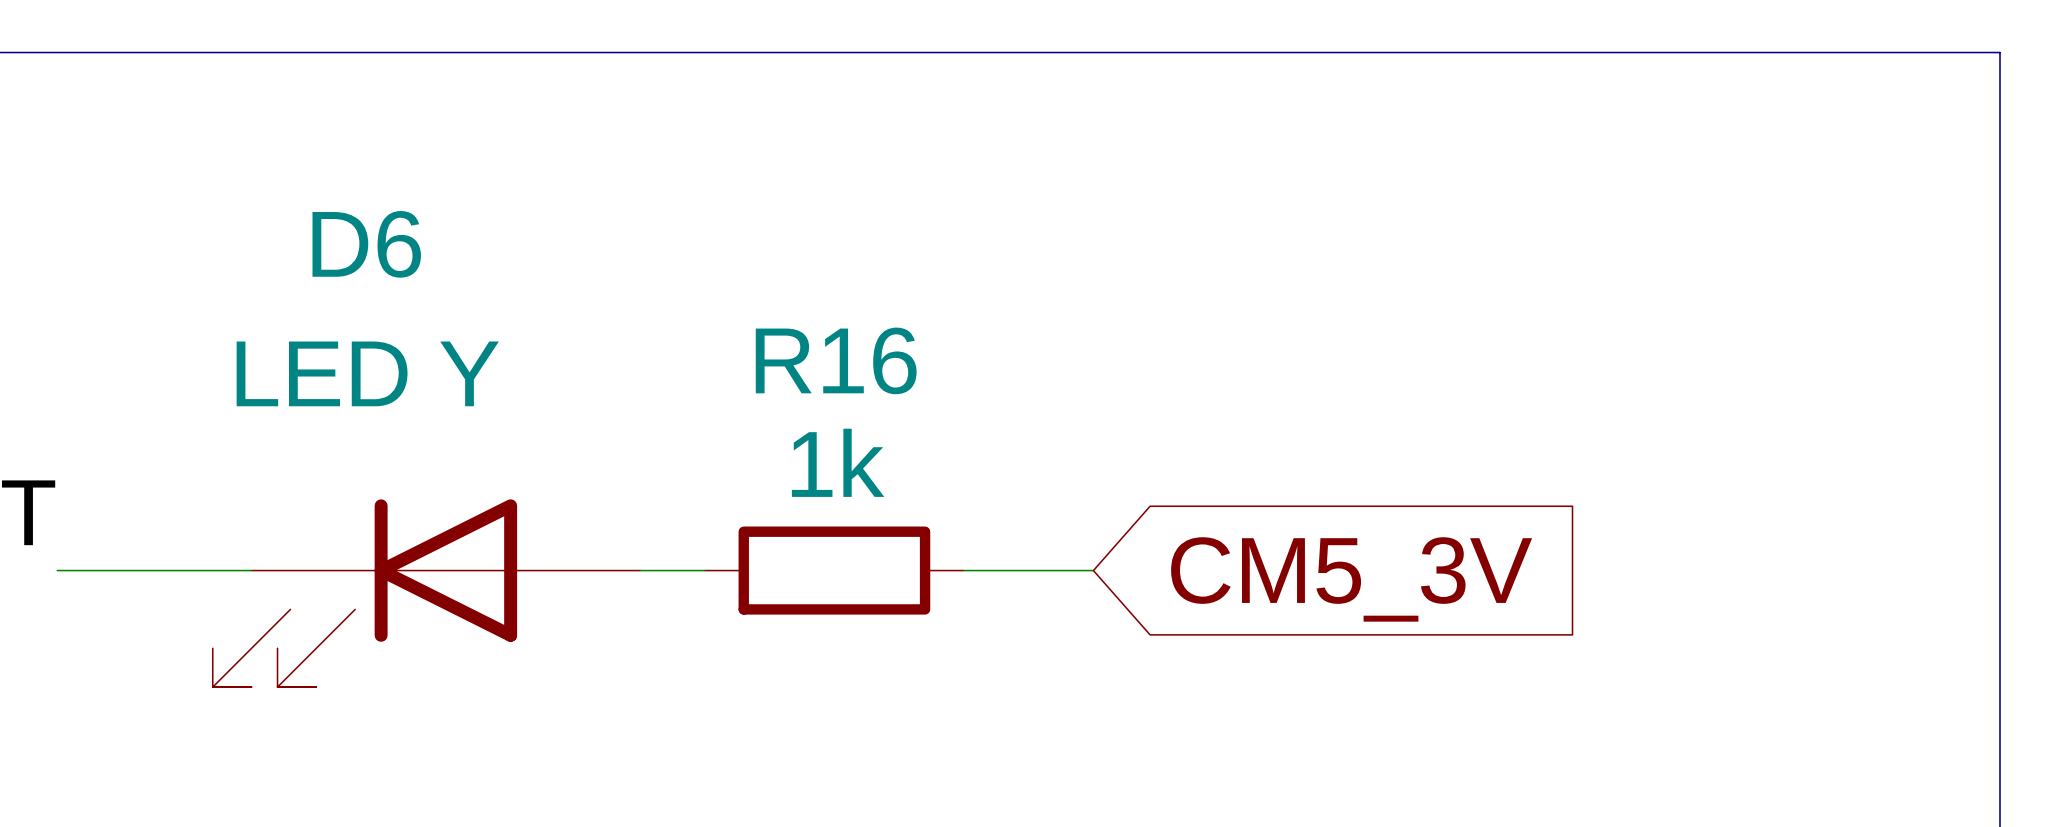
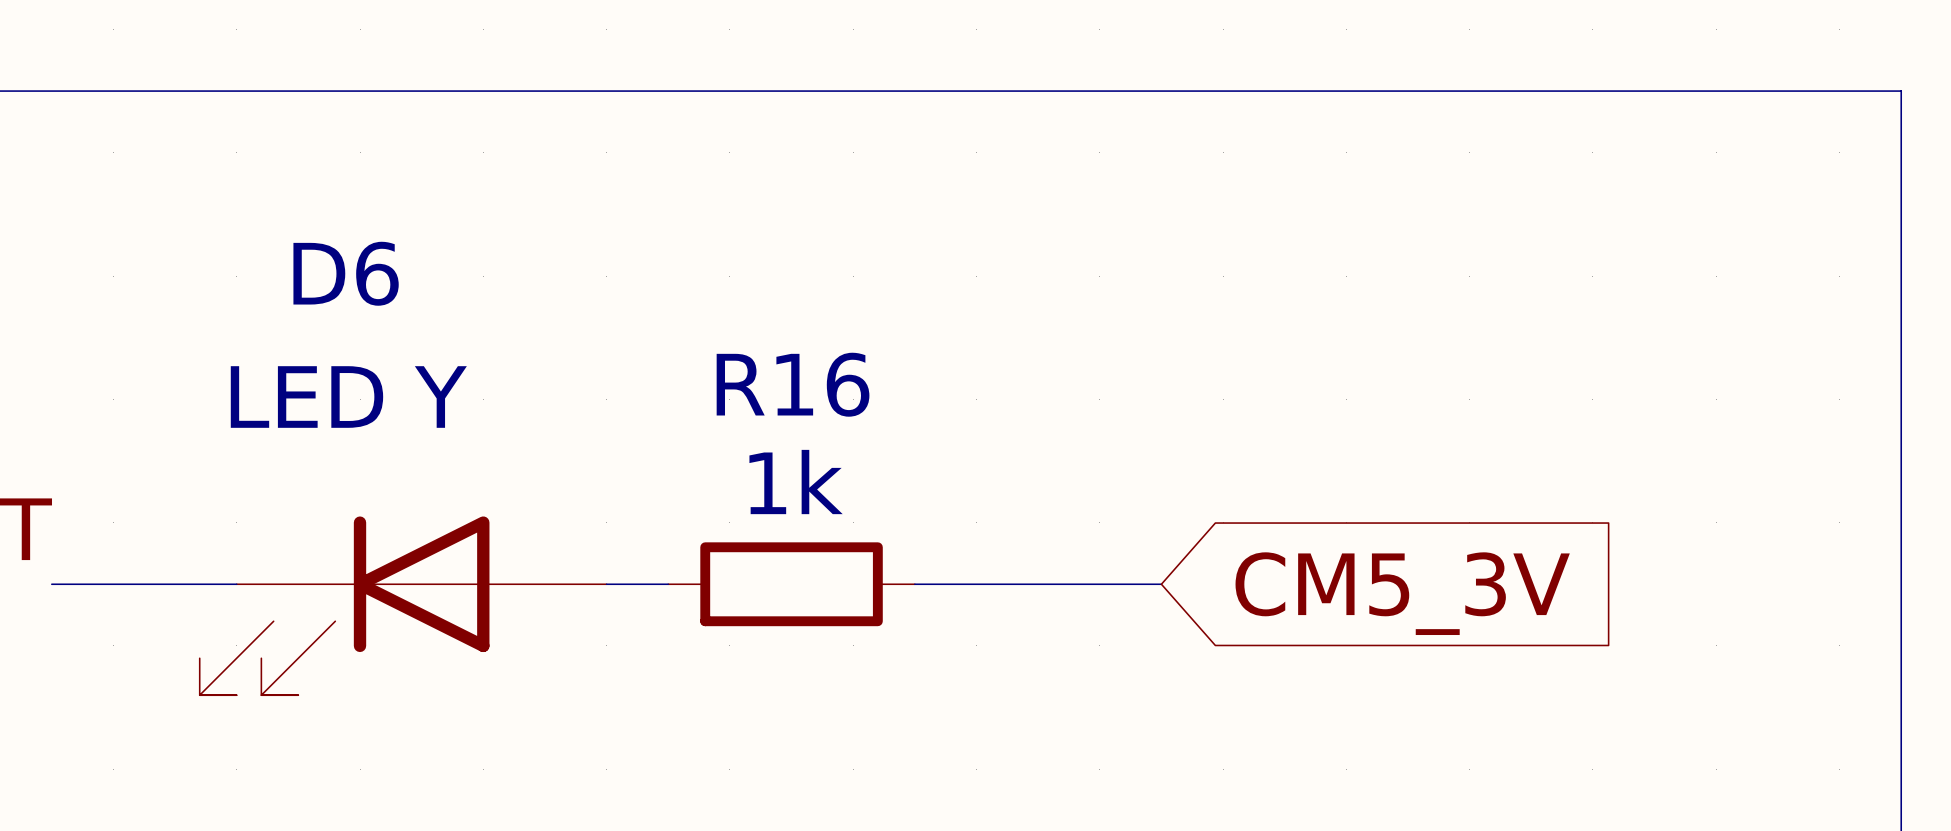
wire: none -> (1038, 584) (1161, 584)
global label position: CM5_3V (1351, 579) -> CM5_3V (1402, 593)

